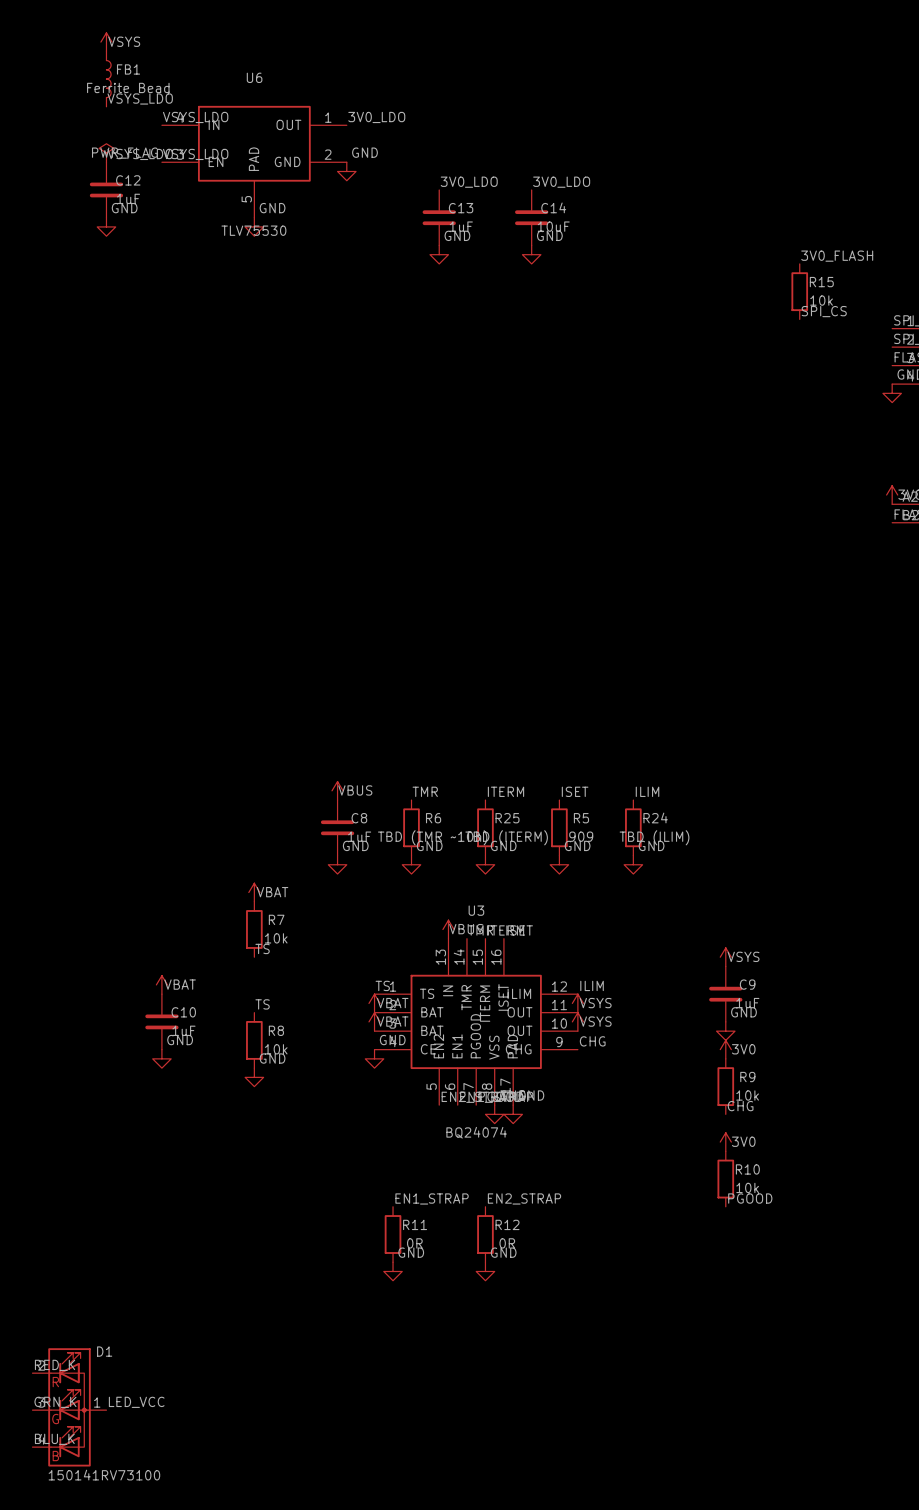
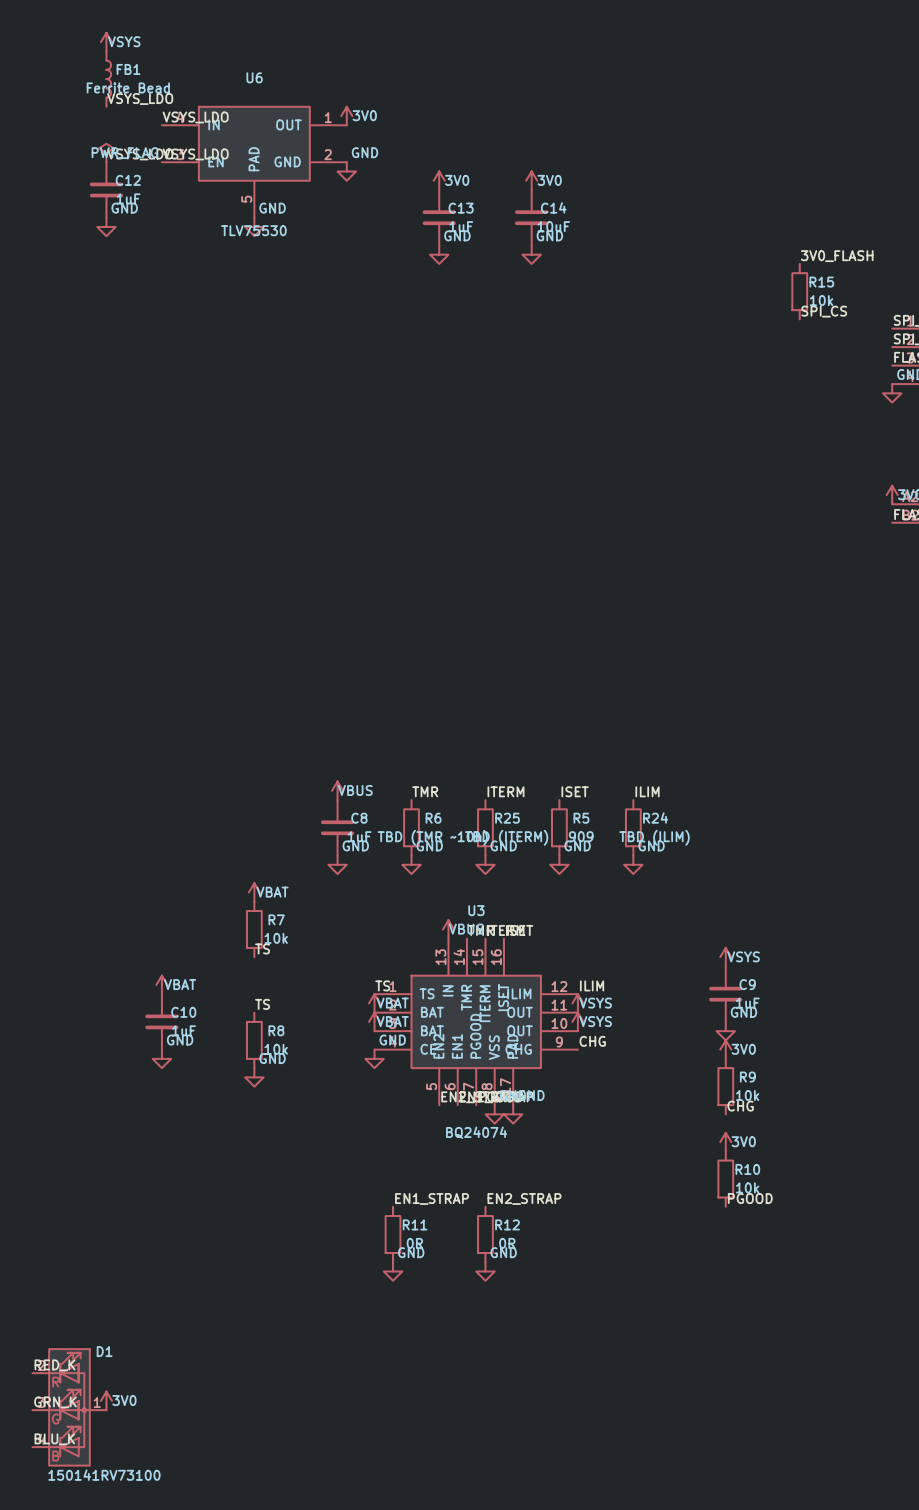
power symbol: none -> 3V0 (346, 116)
label: 3V0_LDO (376, 117) -> none
power symbol: none -> 3V0 (439, 180)
power symbol: none -> 3V0 (531, 180)
label: 3V0_LDO (469, 182) -> none
label: 3V0_LDO (561, 182) -> none
power symbol: none -> 3V0 (106, 1400)
label: LED_VCC (136, 1402) -> none

